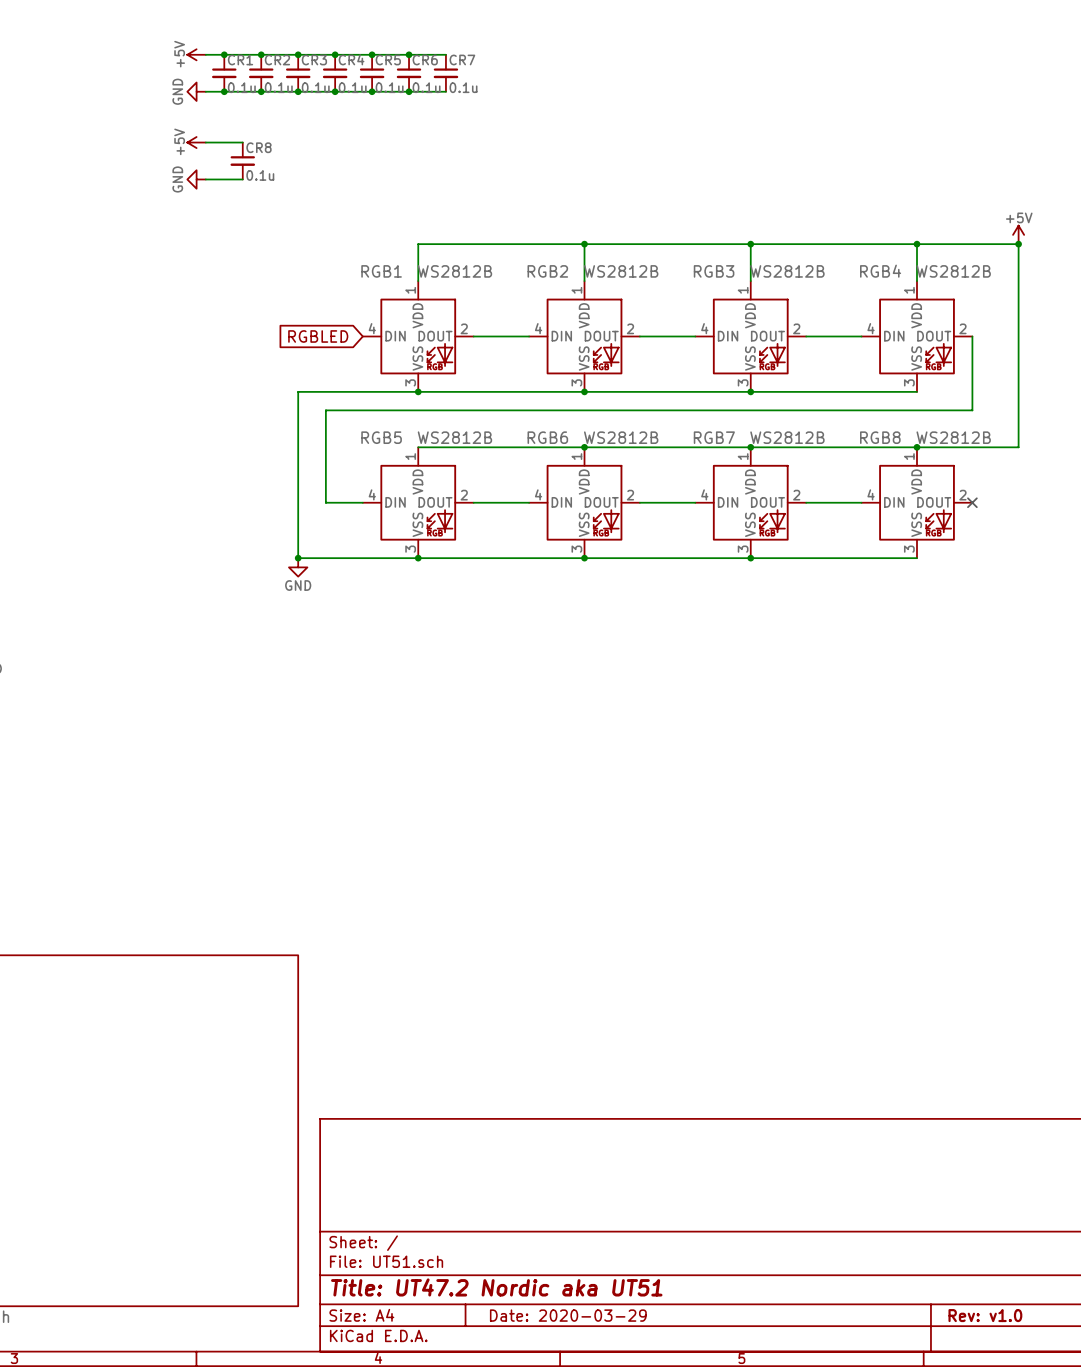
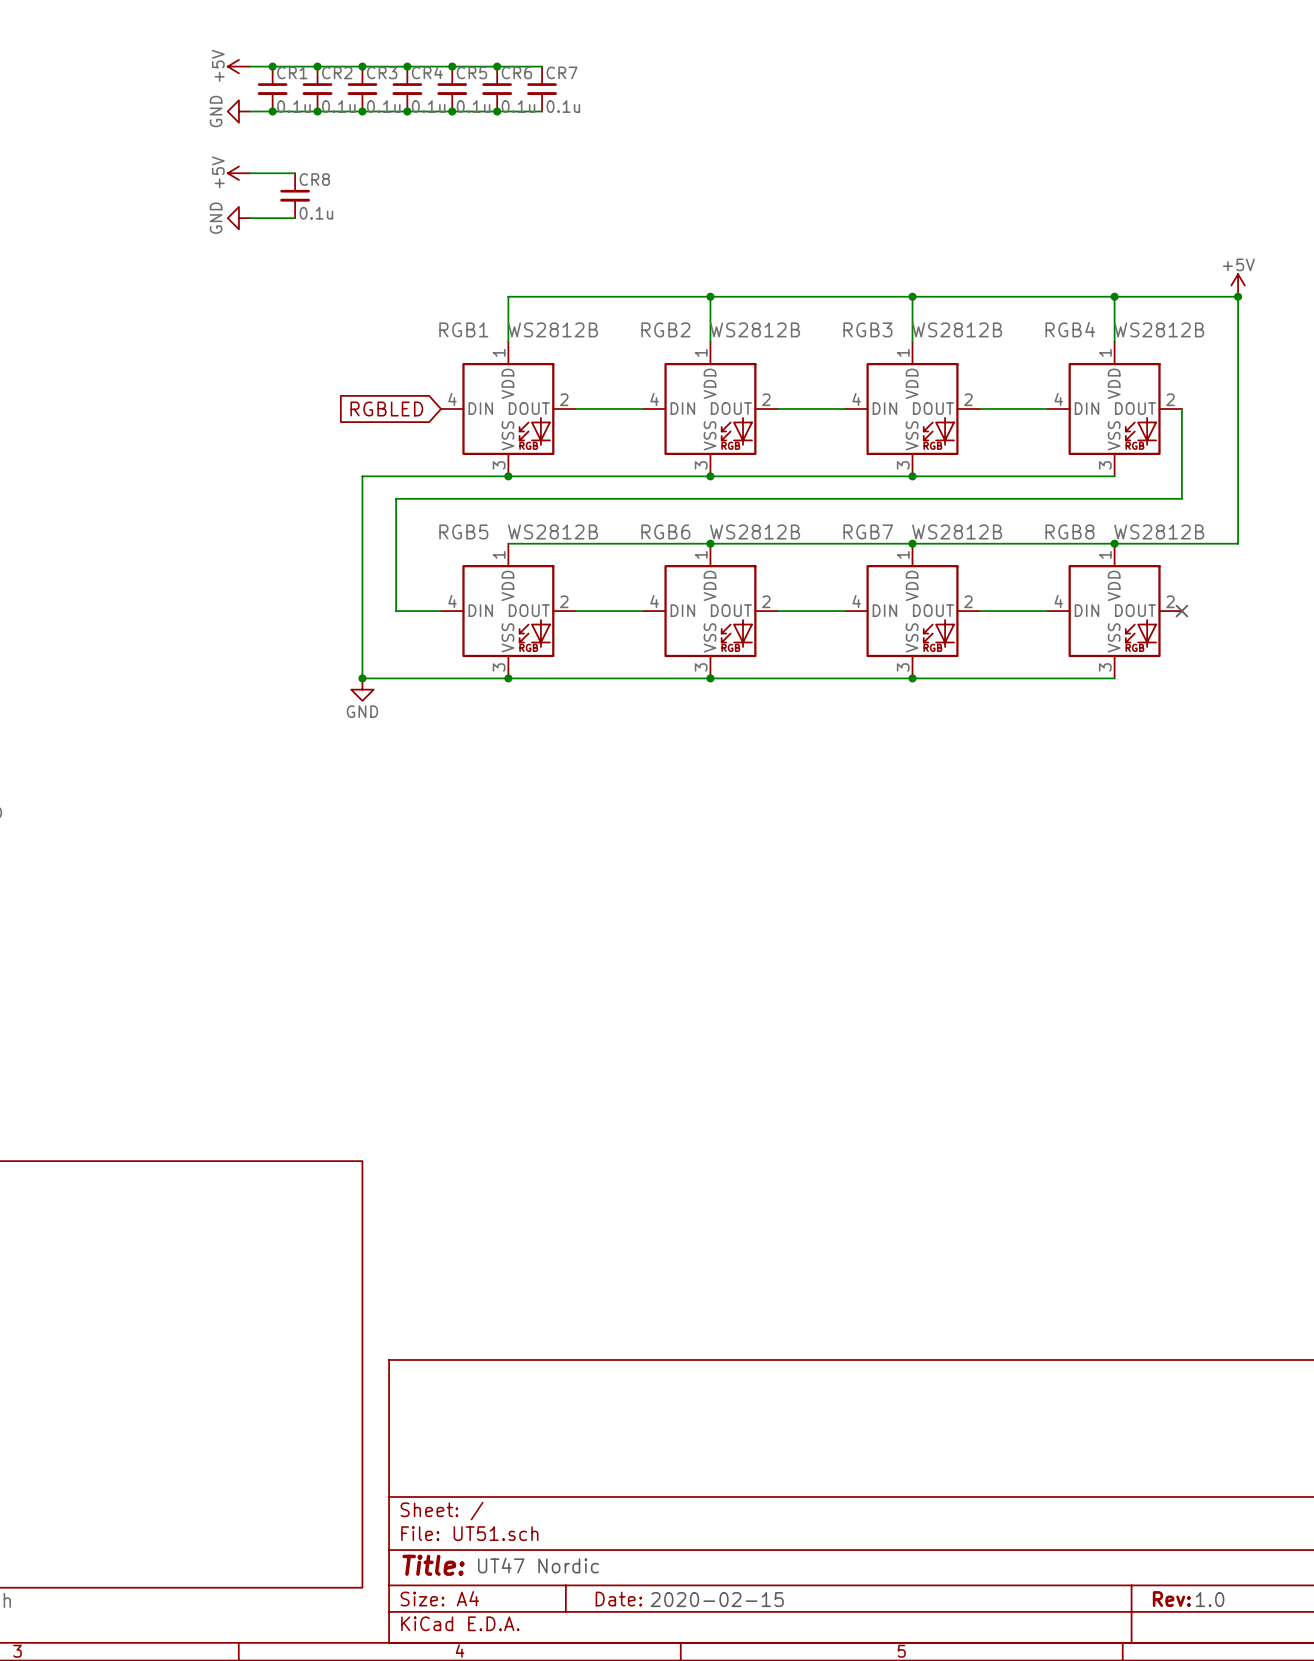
title block: Title: UT47.2 Nordic aka UT51 (496, 1287) -> Title: (433, 1565)
text: none -> UT47 Nordic (538, 1565)
title block: Date: 2020-03-29 (568, 1315) -> Date: (618, 1599)
title block: Rev: v1.0 (985, 1315) -> Rev: (1171, 1599)
text: none -> 2020-02-15 (717, 1599)
text: none -> 1.0 (1210, 1599)

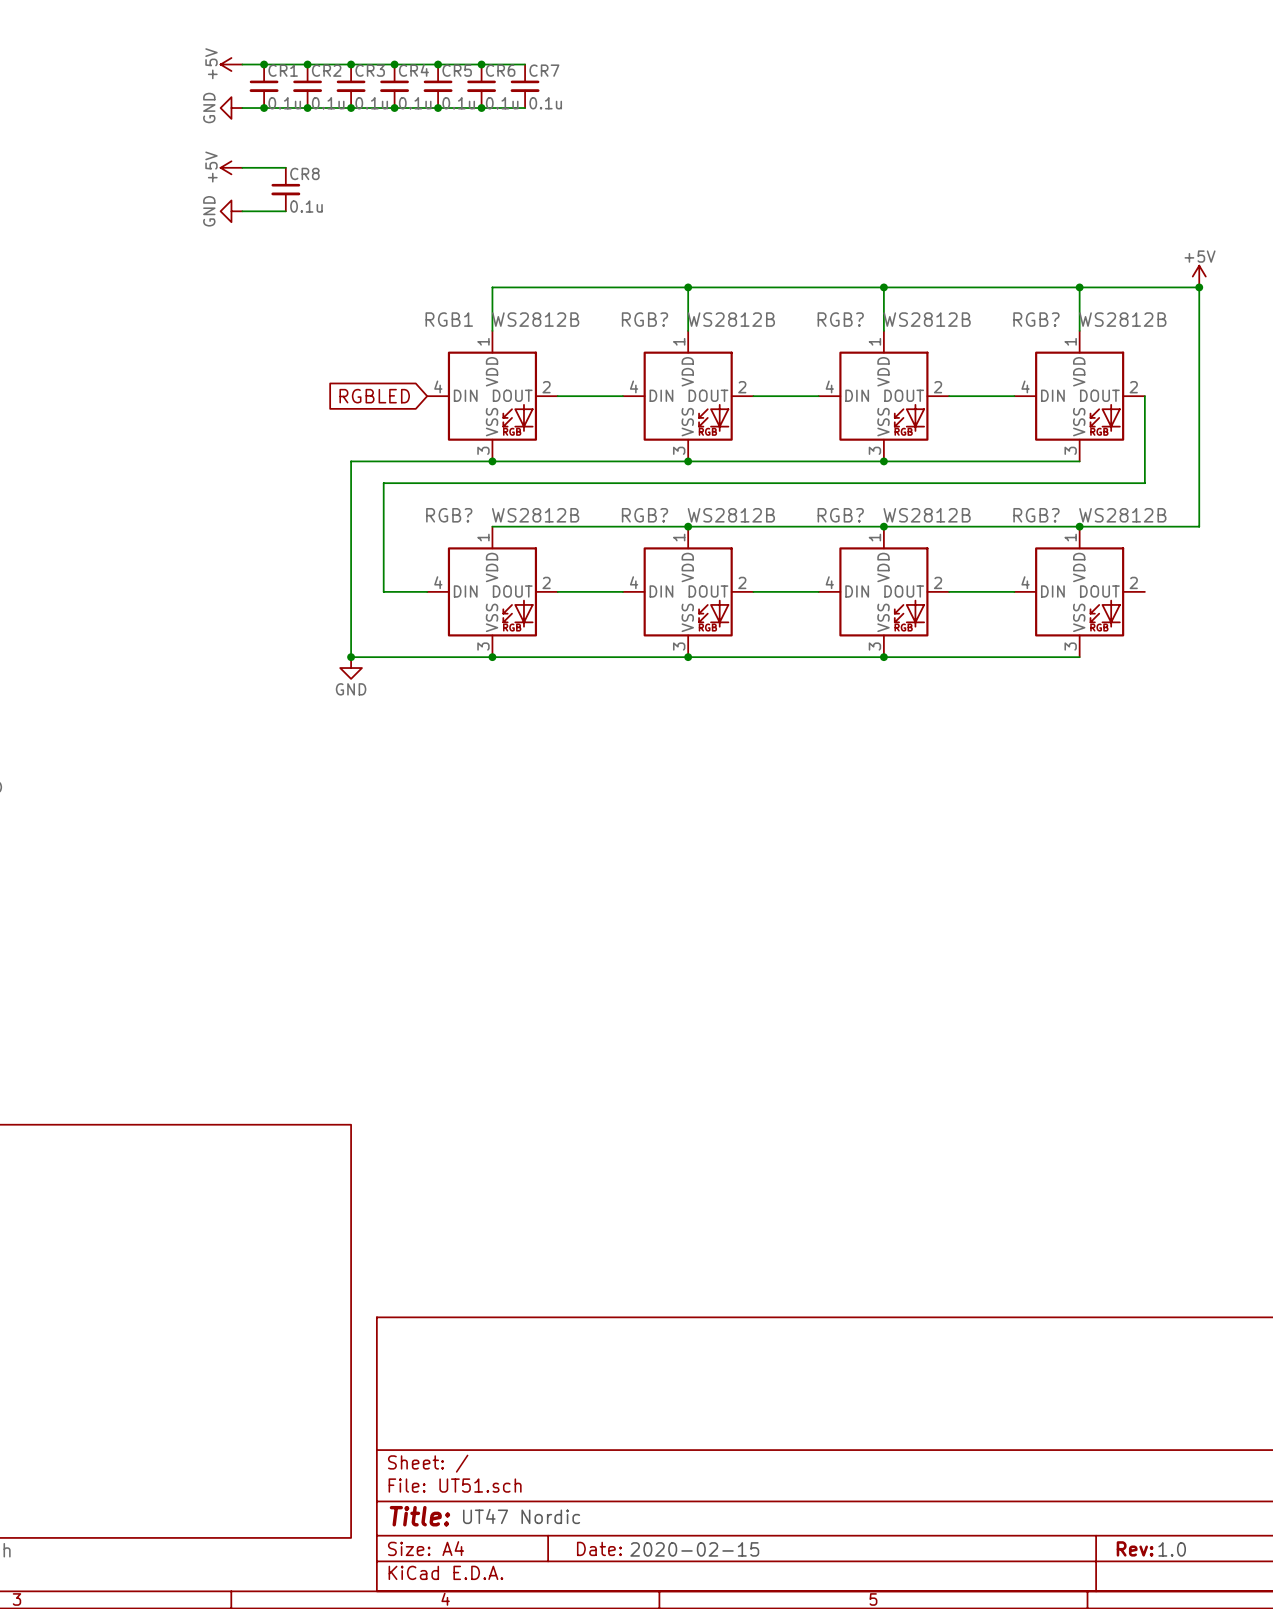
RGB2 name: RGB2 (665, 329) -> RGB? (644, 319)
RGB3 name: RGB3 (867, 329) -> RGB? (840, 319)
RGB4 name: RGB4 (1070, 329) -> RGB? (1036, 319)
RGB5 name: RGB5 (463, 531) -> RGB? (449, 515)
RGB6 name: RGB6 (665, 531) -> RGB? (644, 515)
RGB7 name: RGB7 (868, 531) -> RGB? (840, 515)
RGB8 name: RGB8 (1070, 531) -> RGB? (1036, 515)
no-connect mark: (1181, 611) -> none

